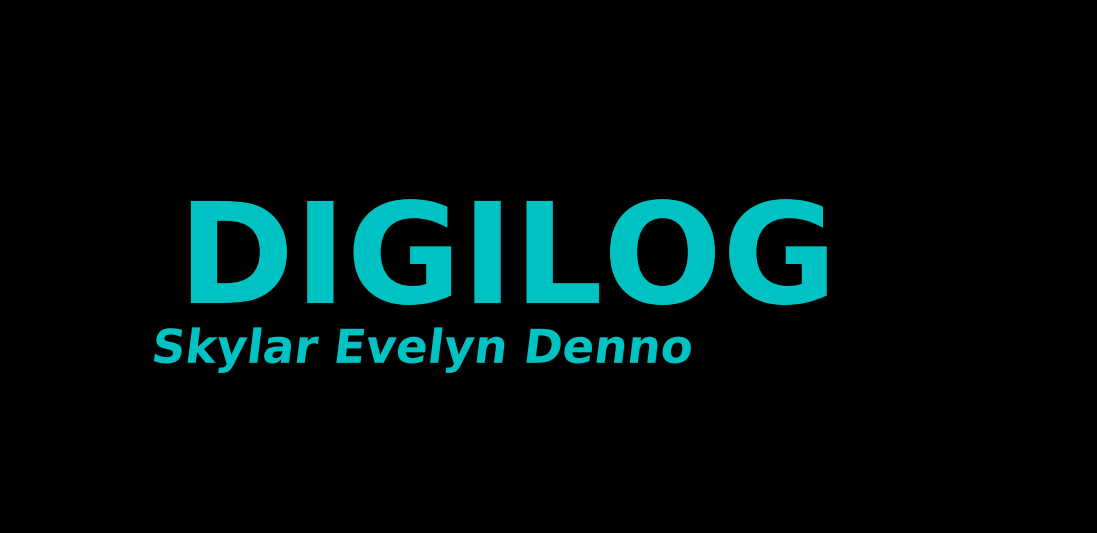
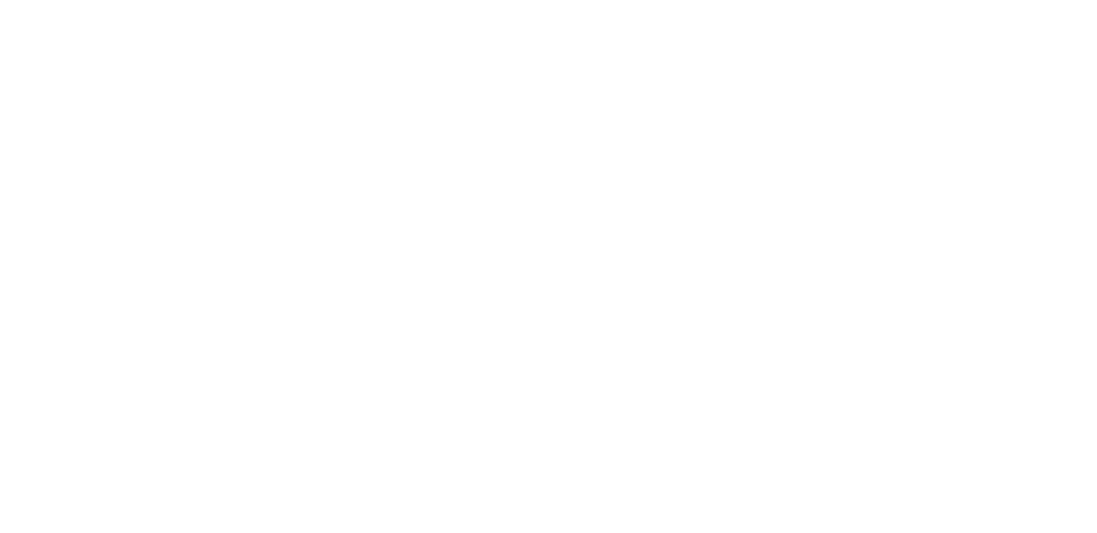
text: DIGILOG (508, 252) -> none
text: Skylar Evelyn Denno (422, 350) -> none

